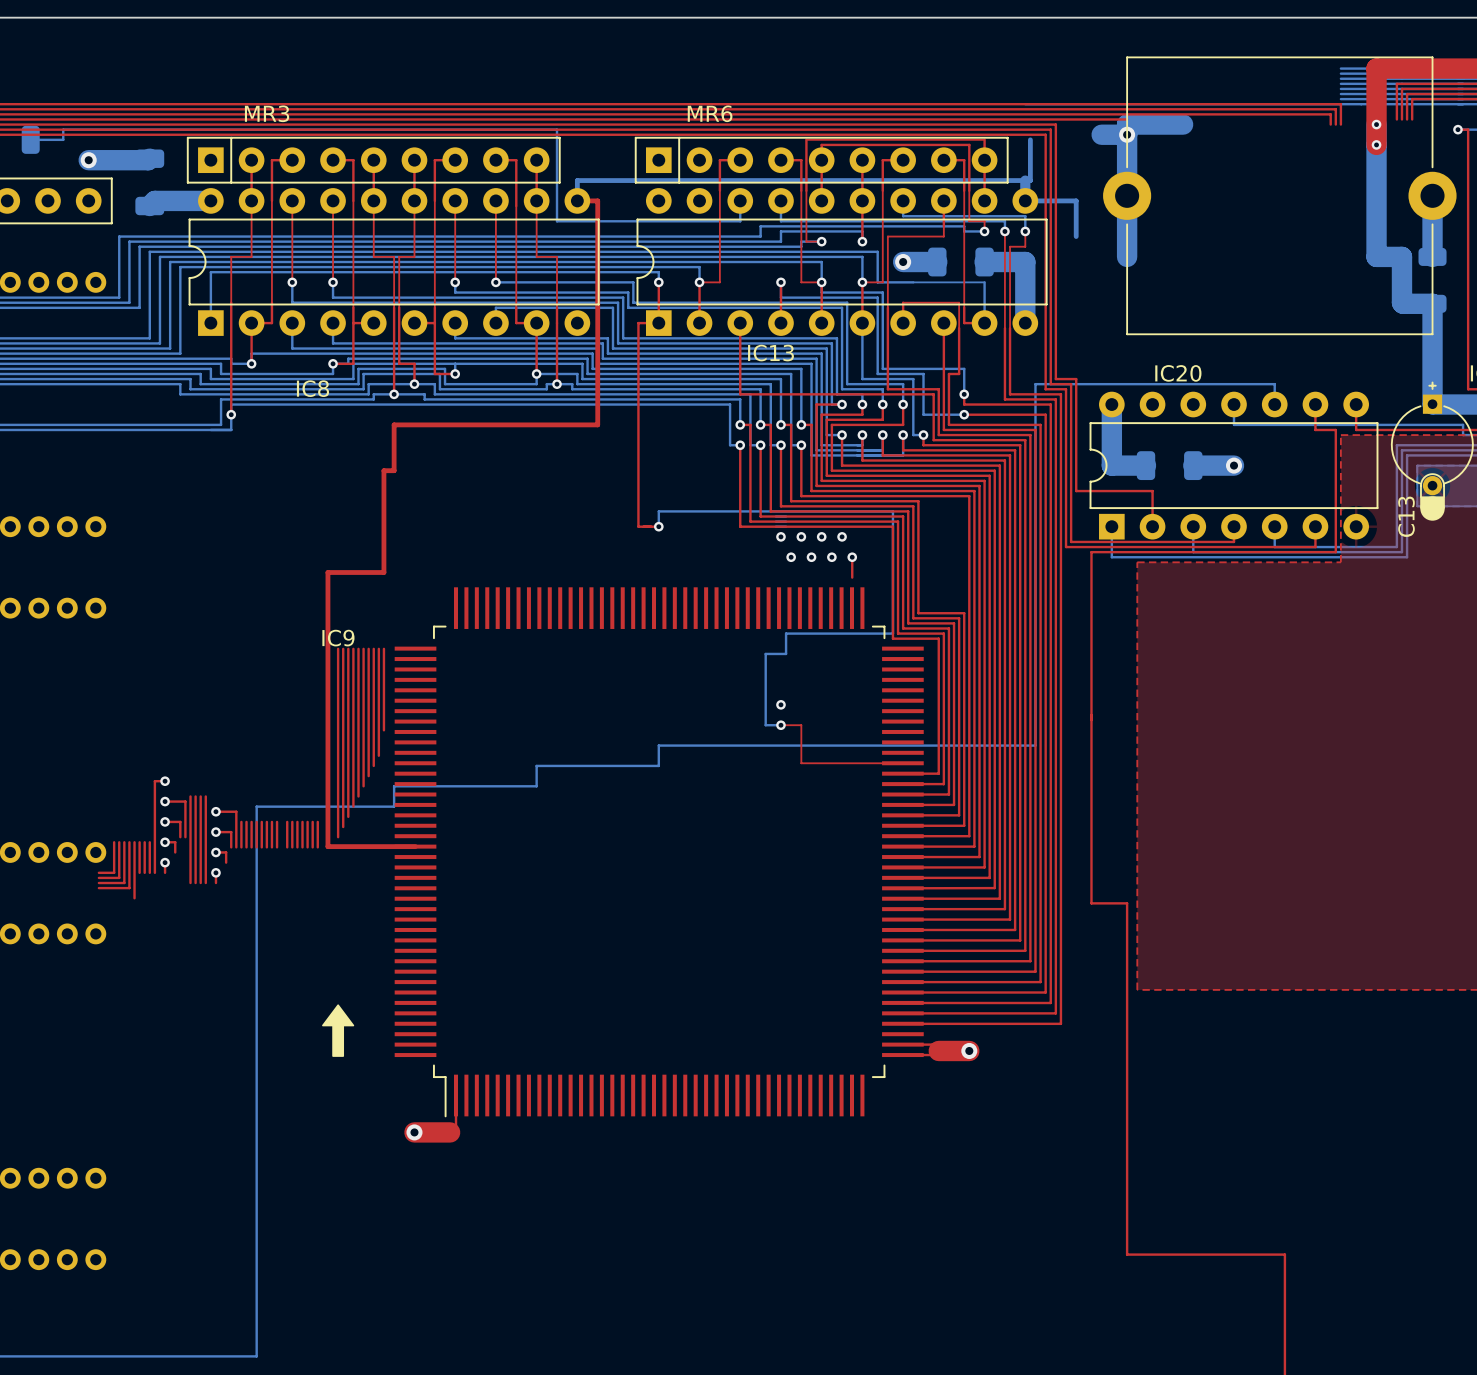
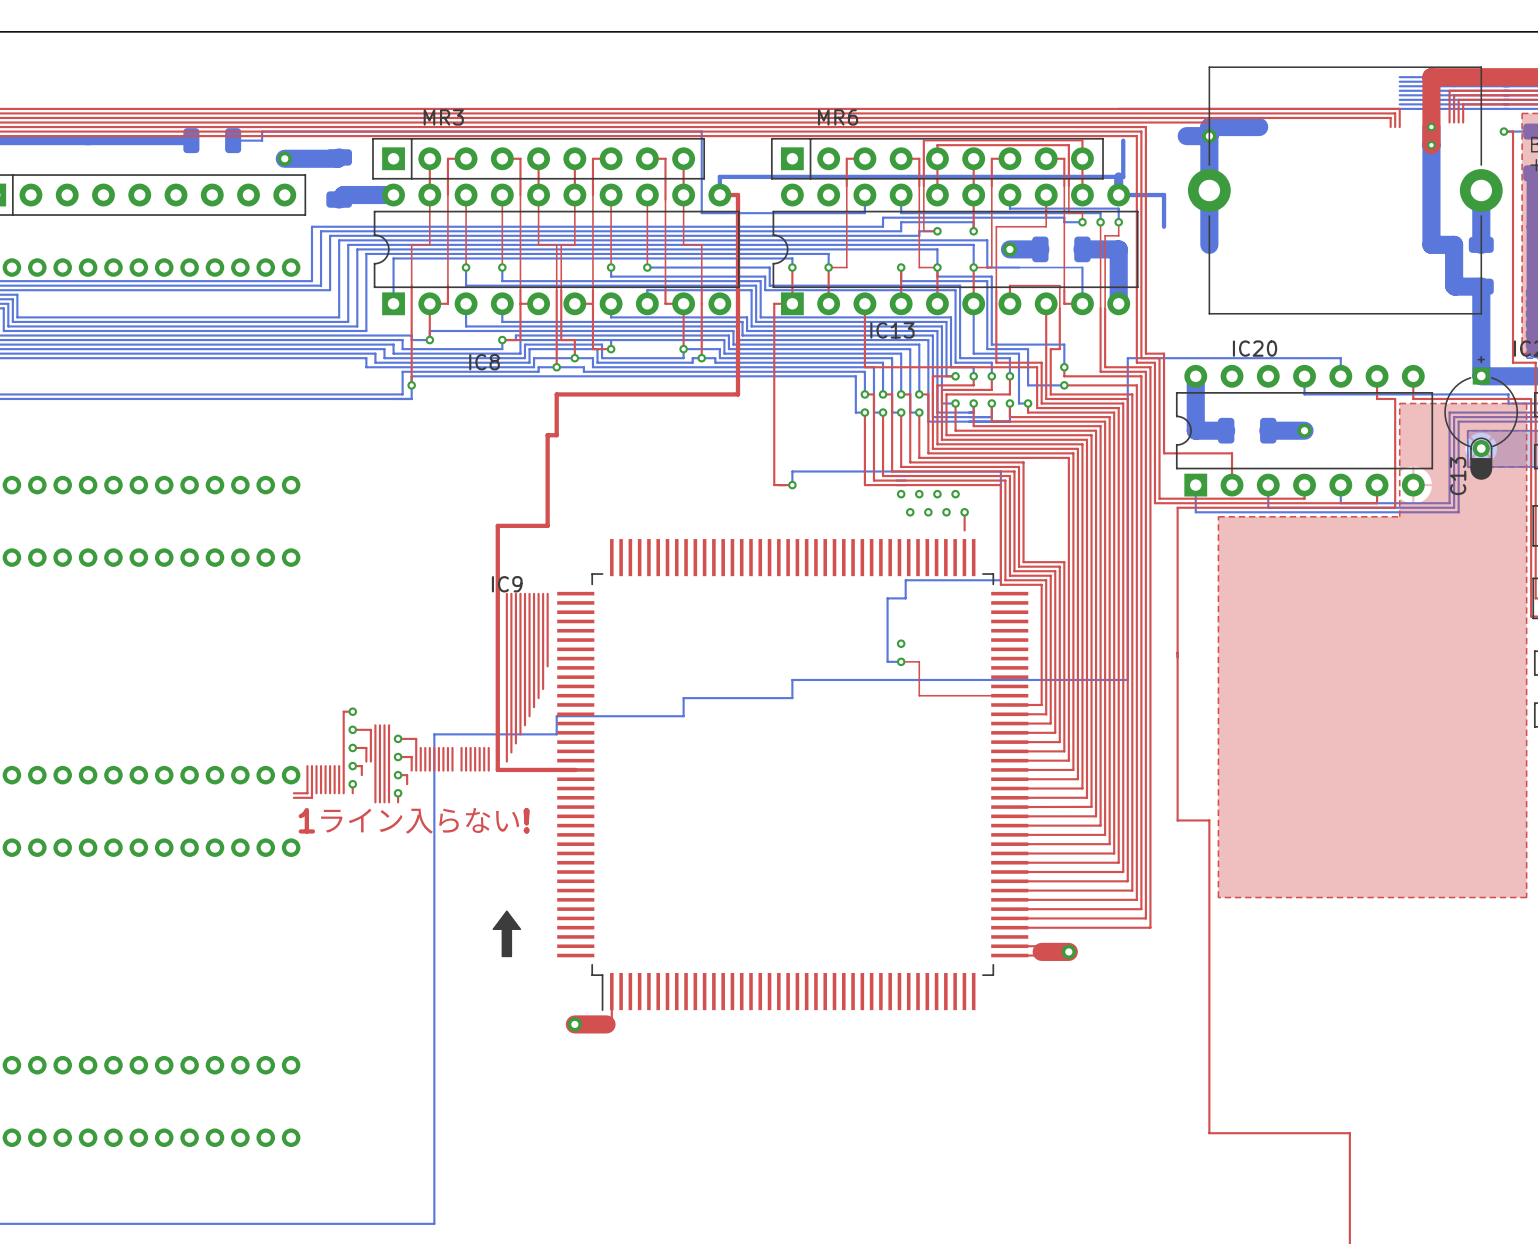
top track: (124, 872) (124, 883) (98, 883) -> none
top track: (129, 872) (129, 888) (98, 888) -> none
top track: (134, 872) (134, 898) -> none
text: none -> 1ライン入らない! (414, 820)

